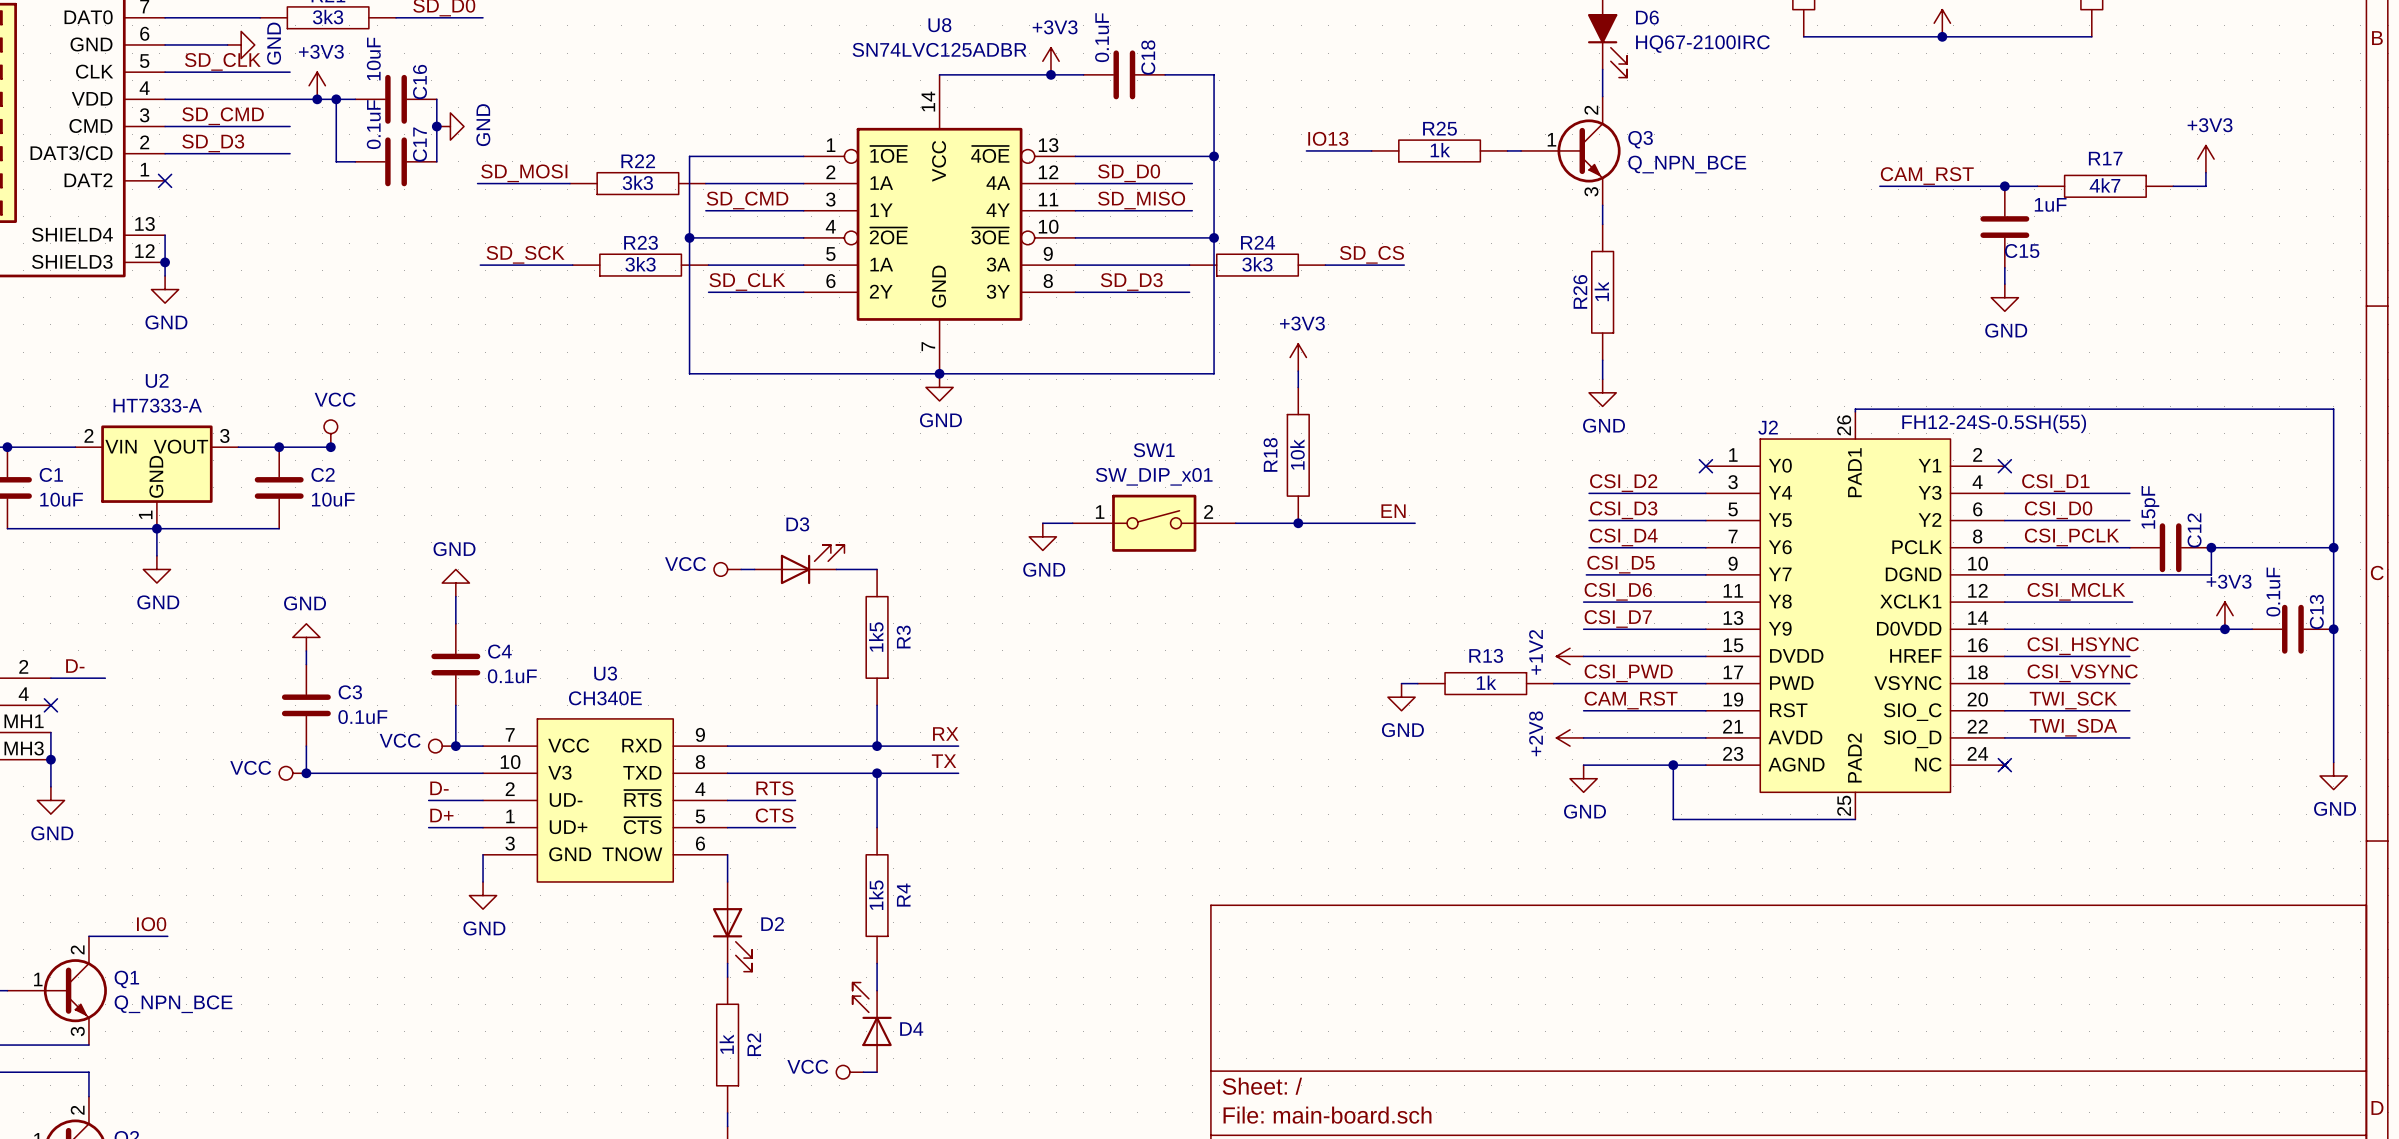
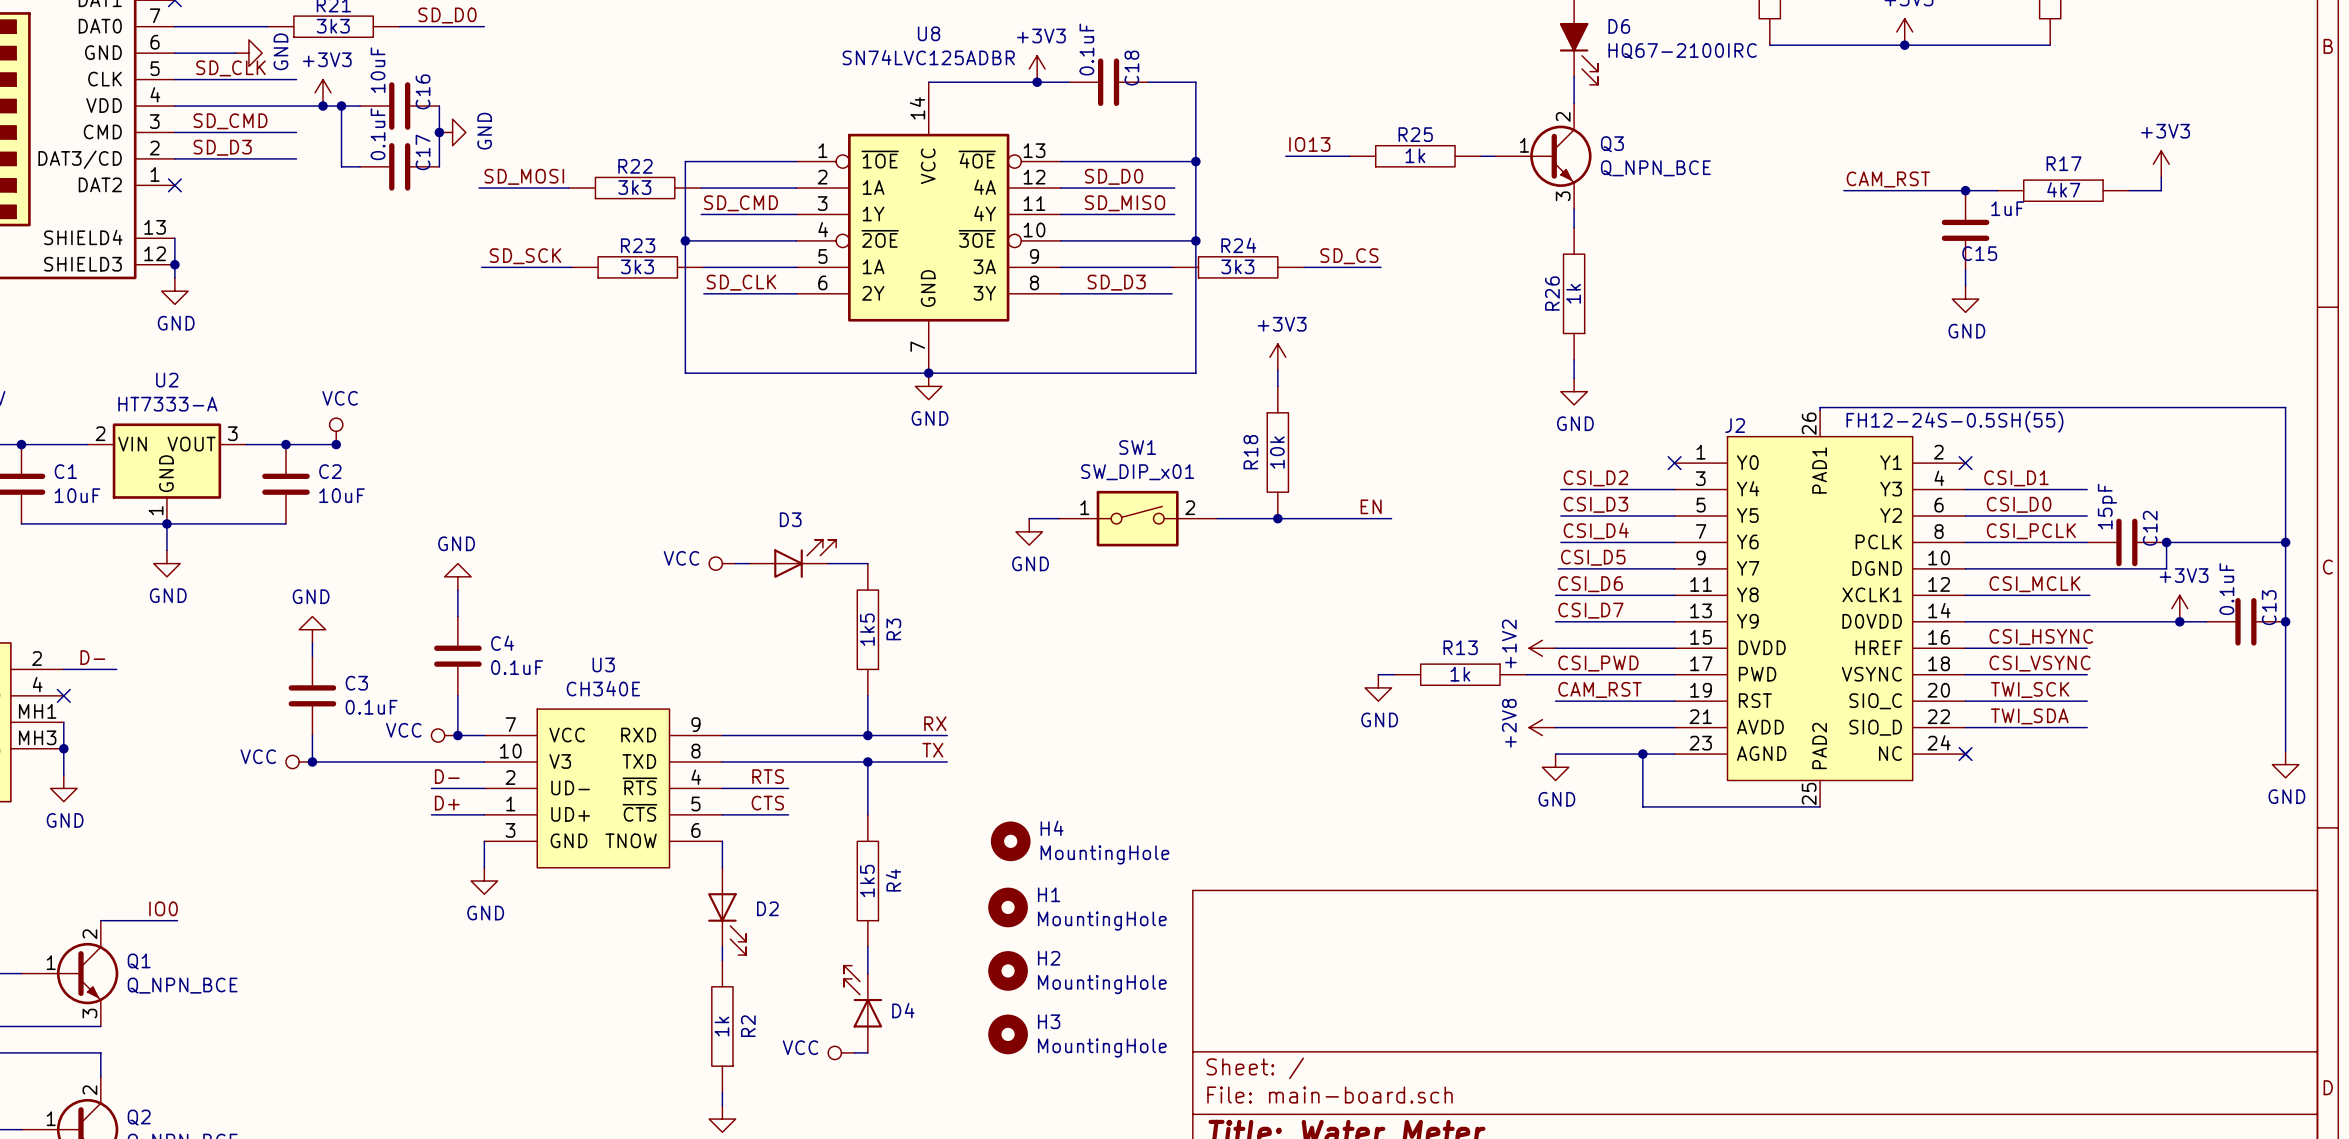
H4: none -> MountingHole (1010, 841)
H1: none -> MountingHole (1008, 907)
H2: none -> MountingHole (1008, 970)
H3: none -> MountingHole (1008, 1034)

